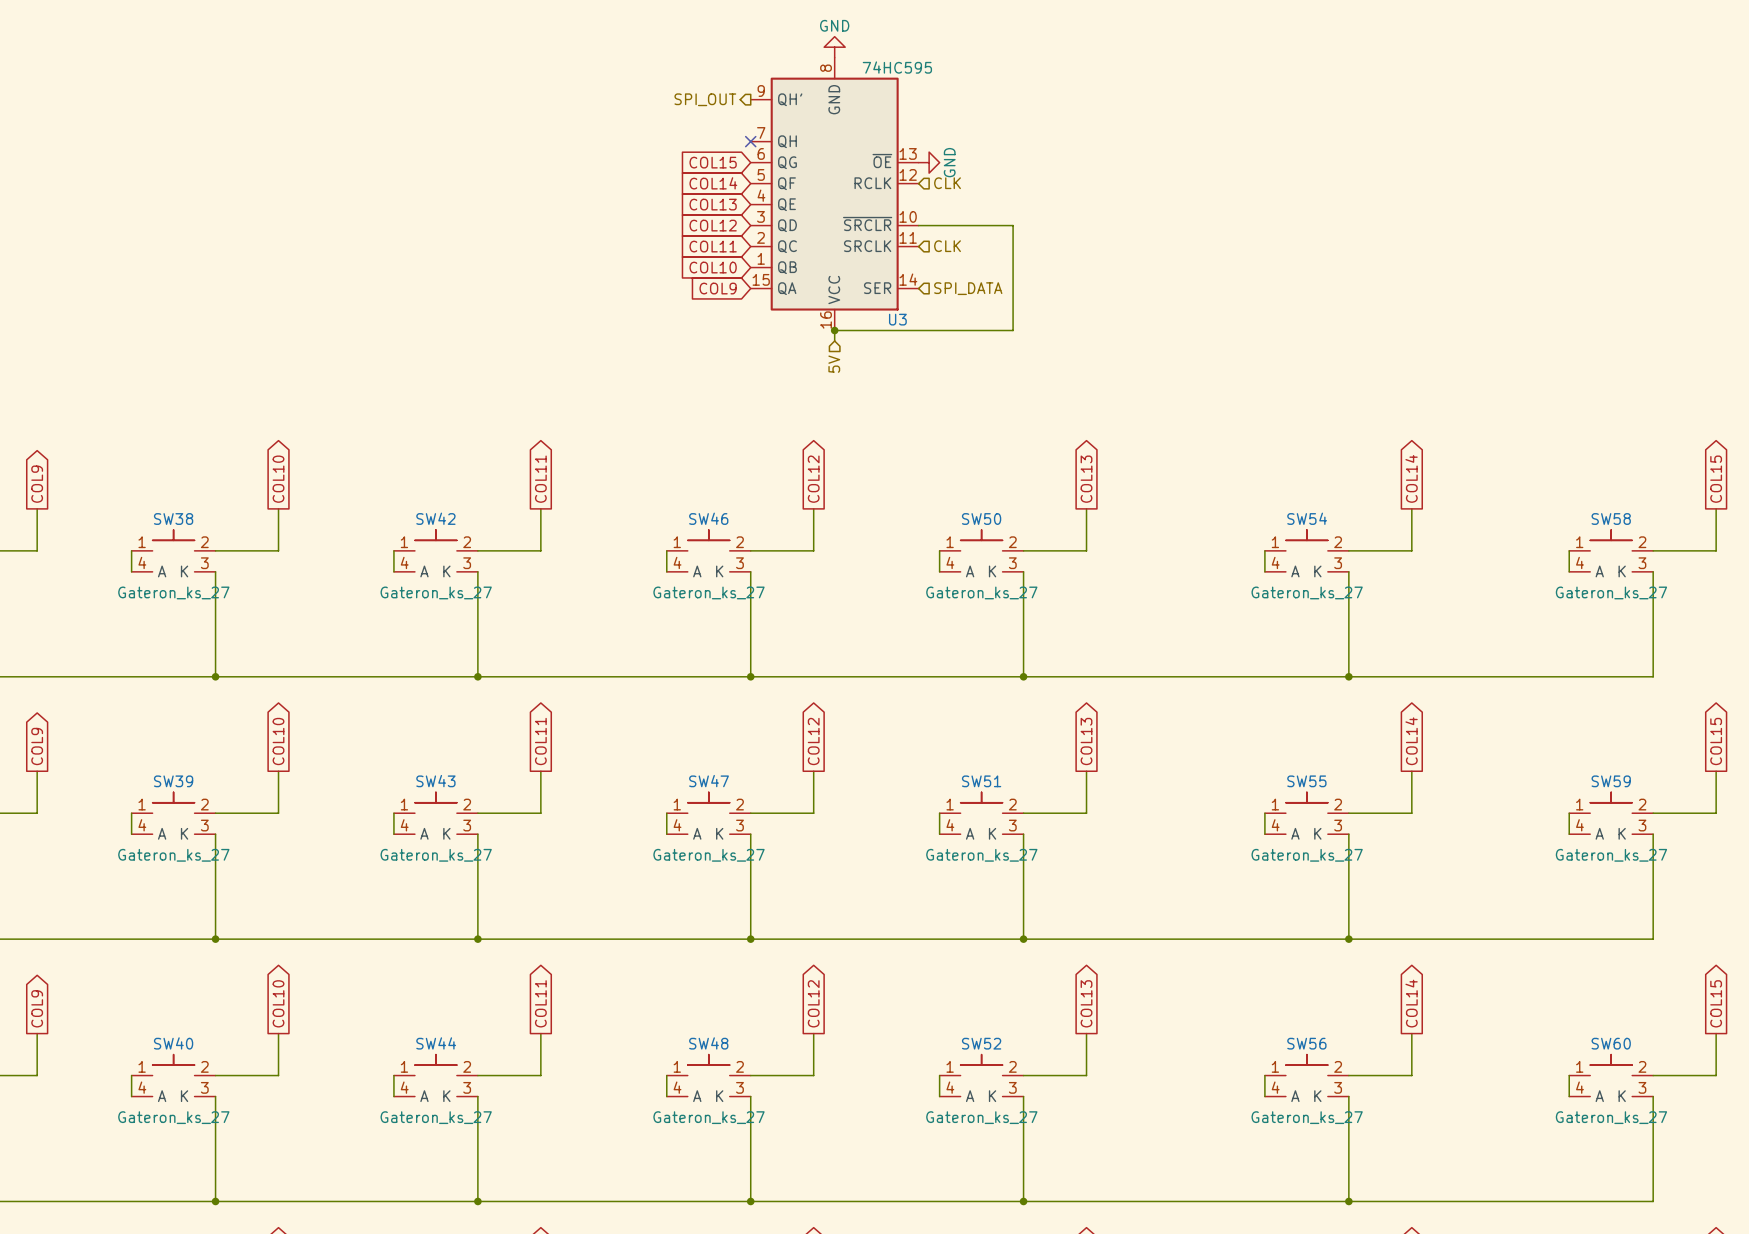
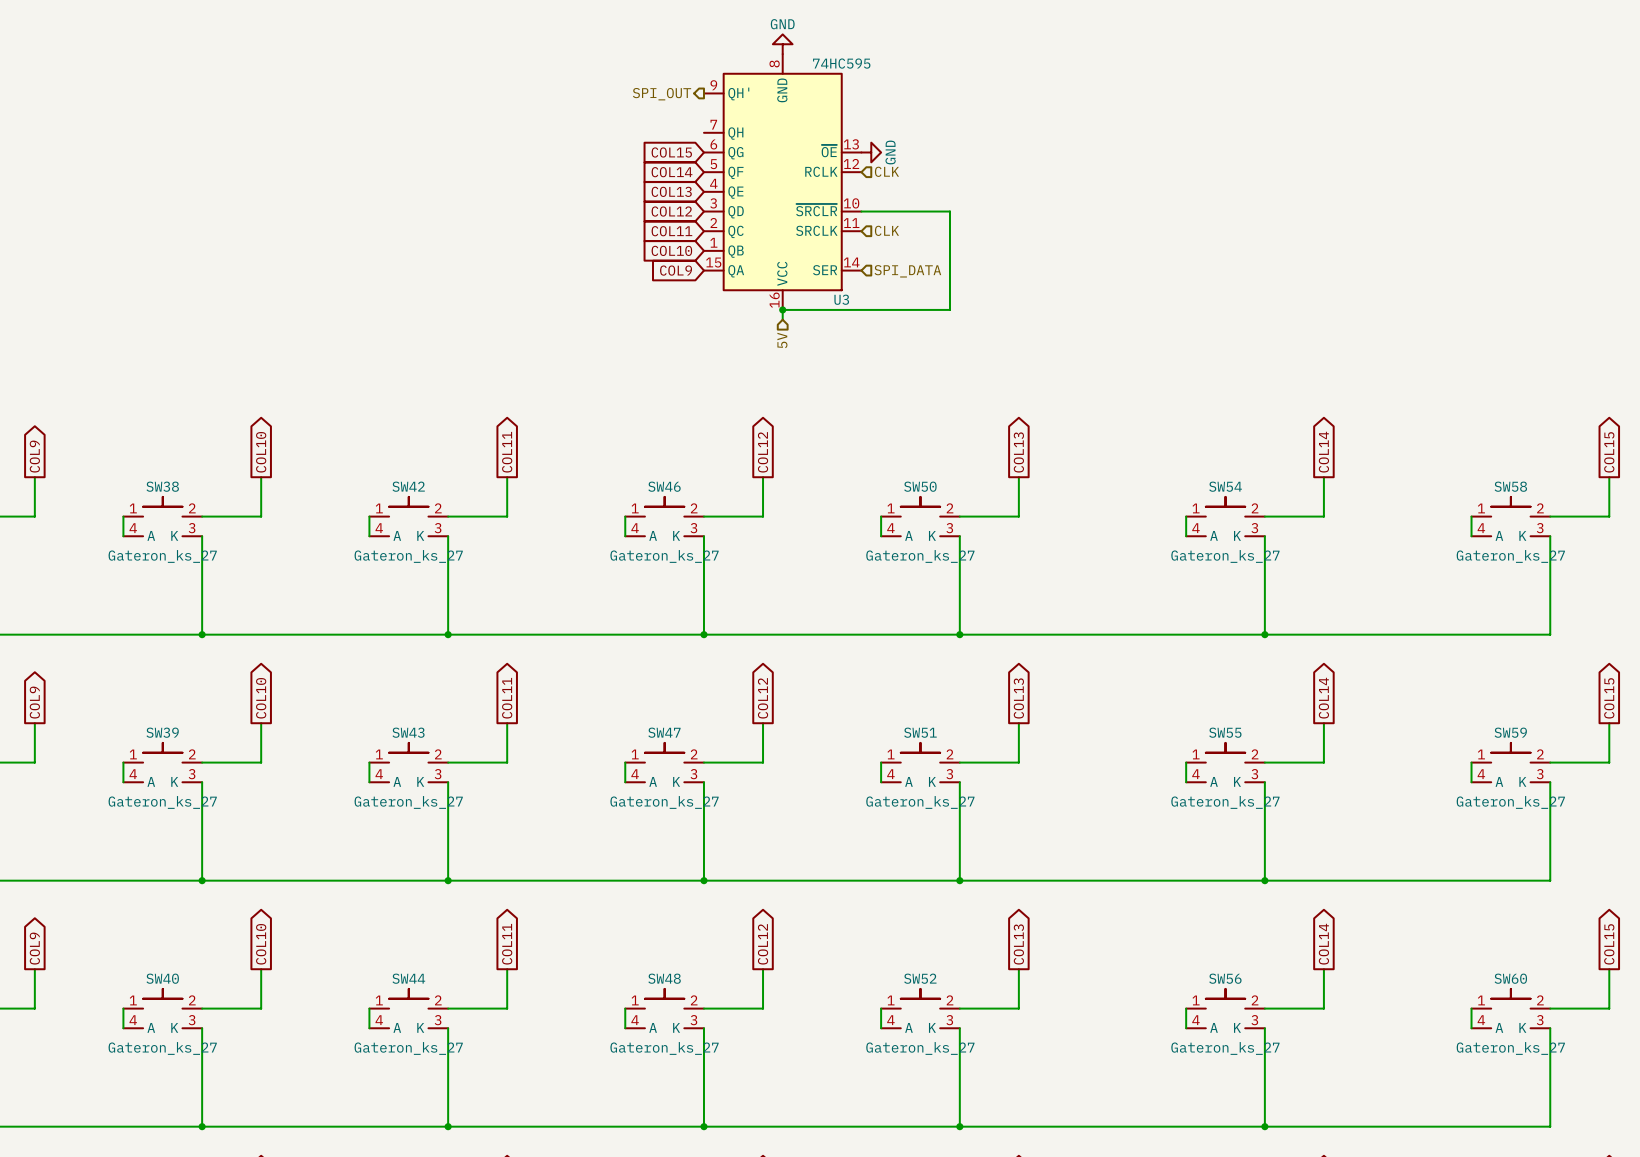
no-connect mark: (750, 141) -> none

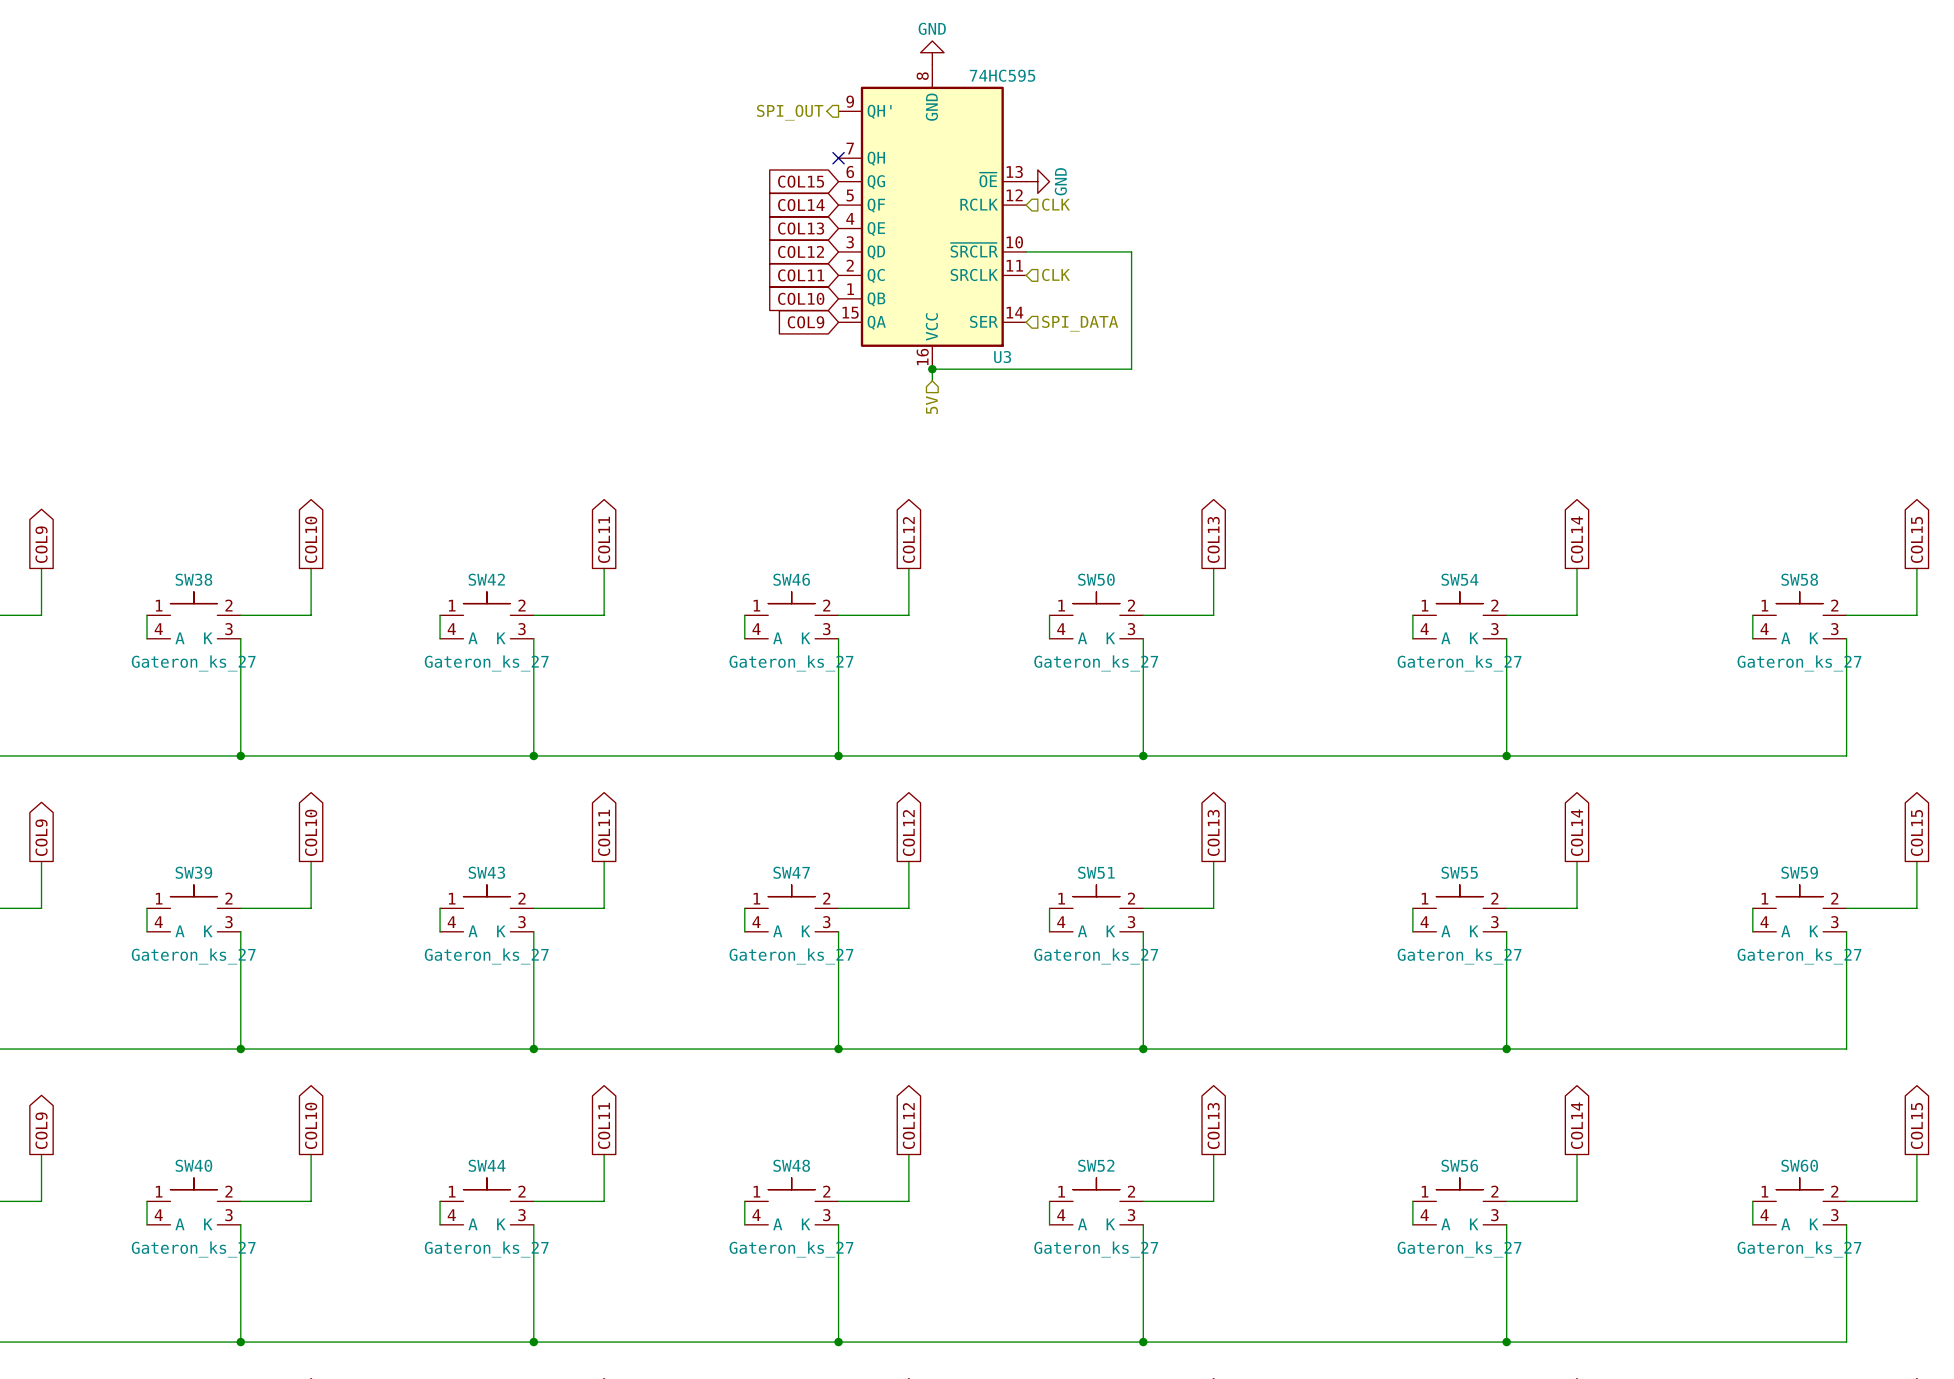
no-connect mark: none -> (838, 158)

